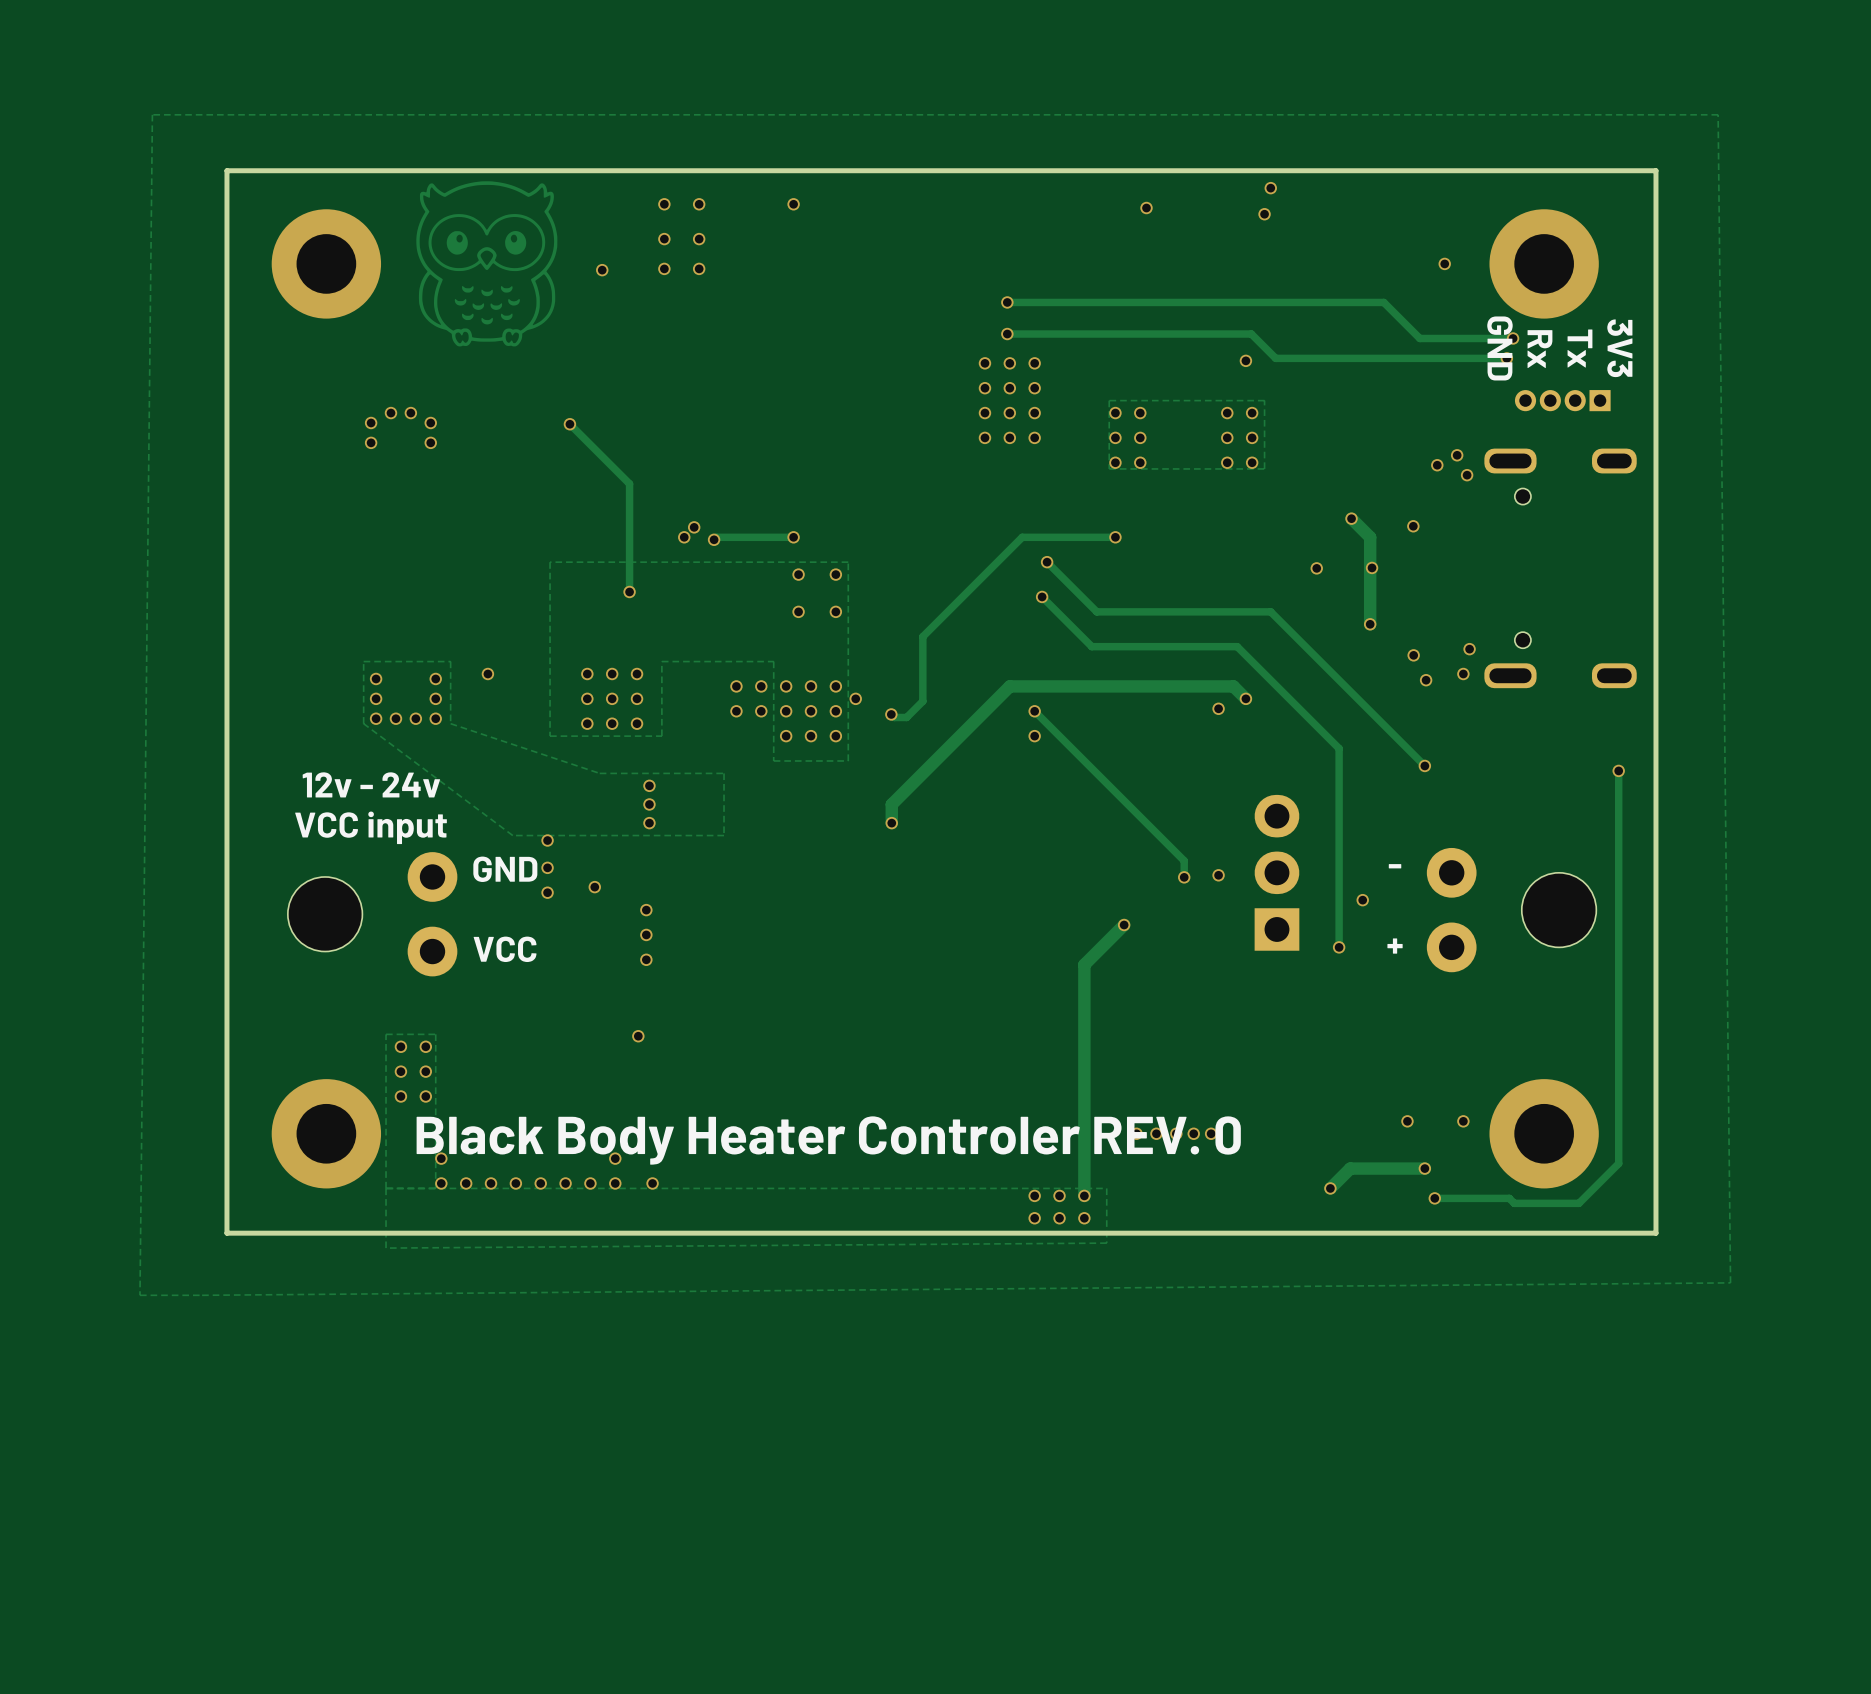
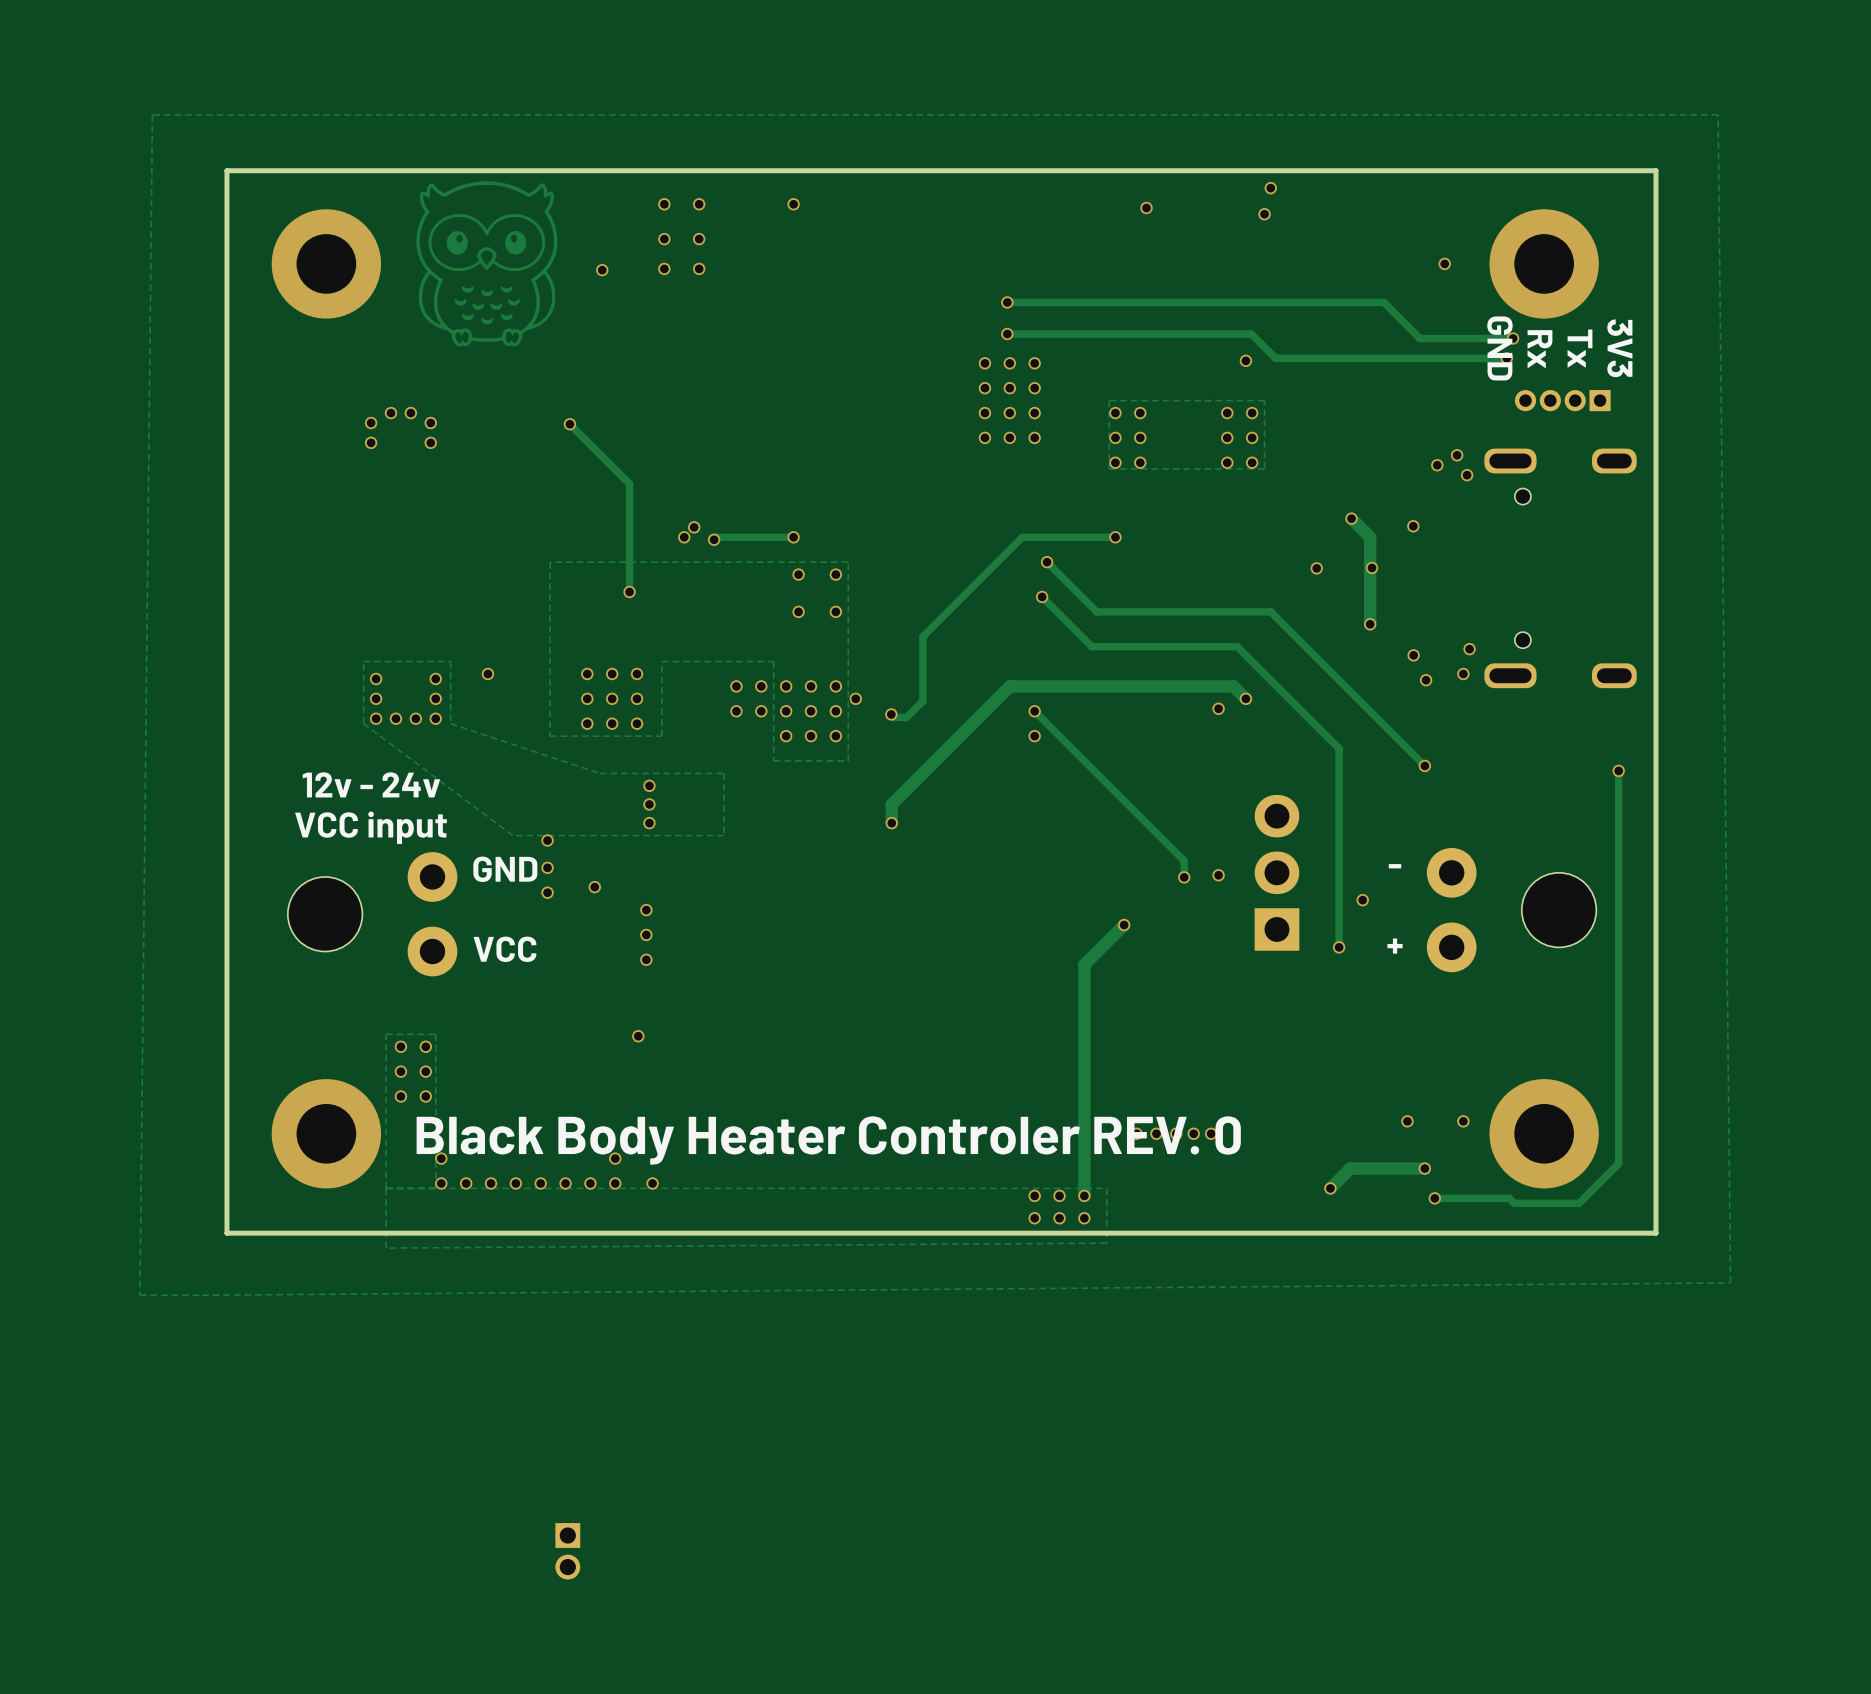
part: none -> (567, 1551)

